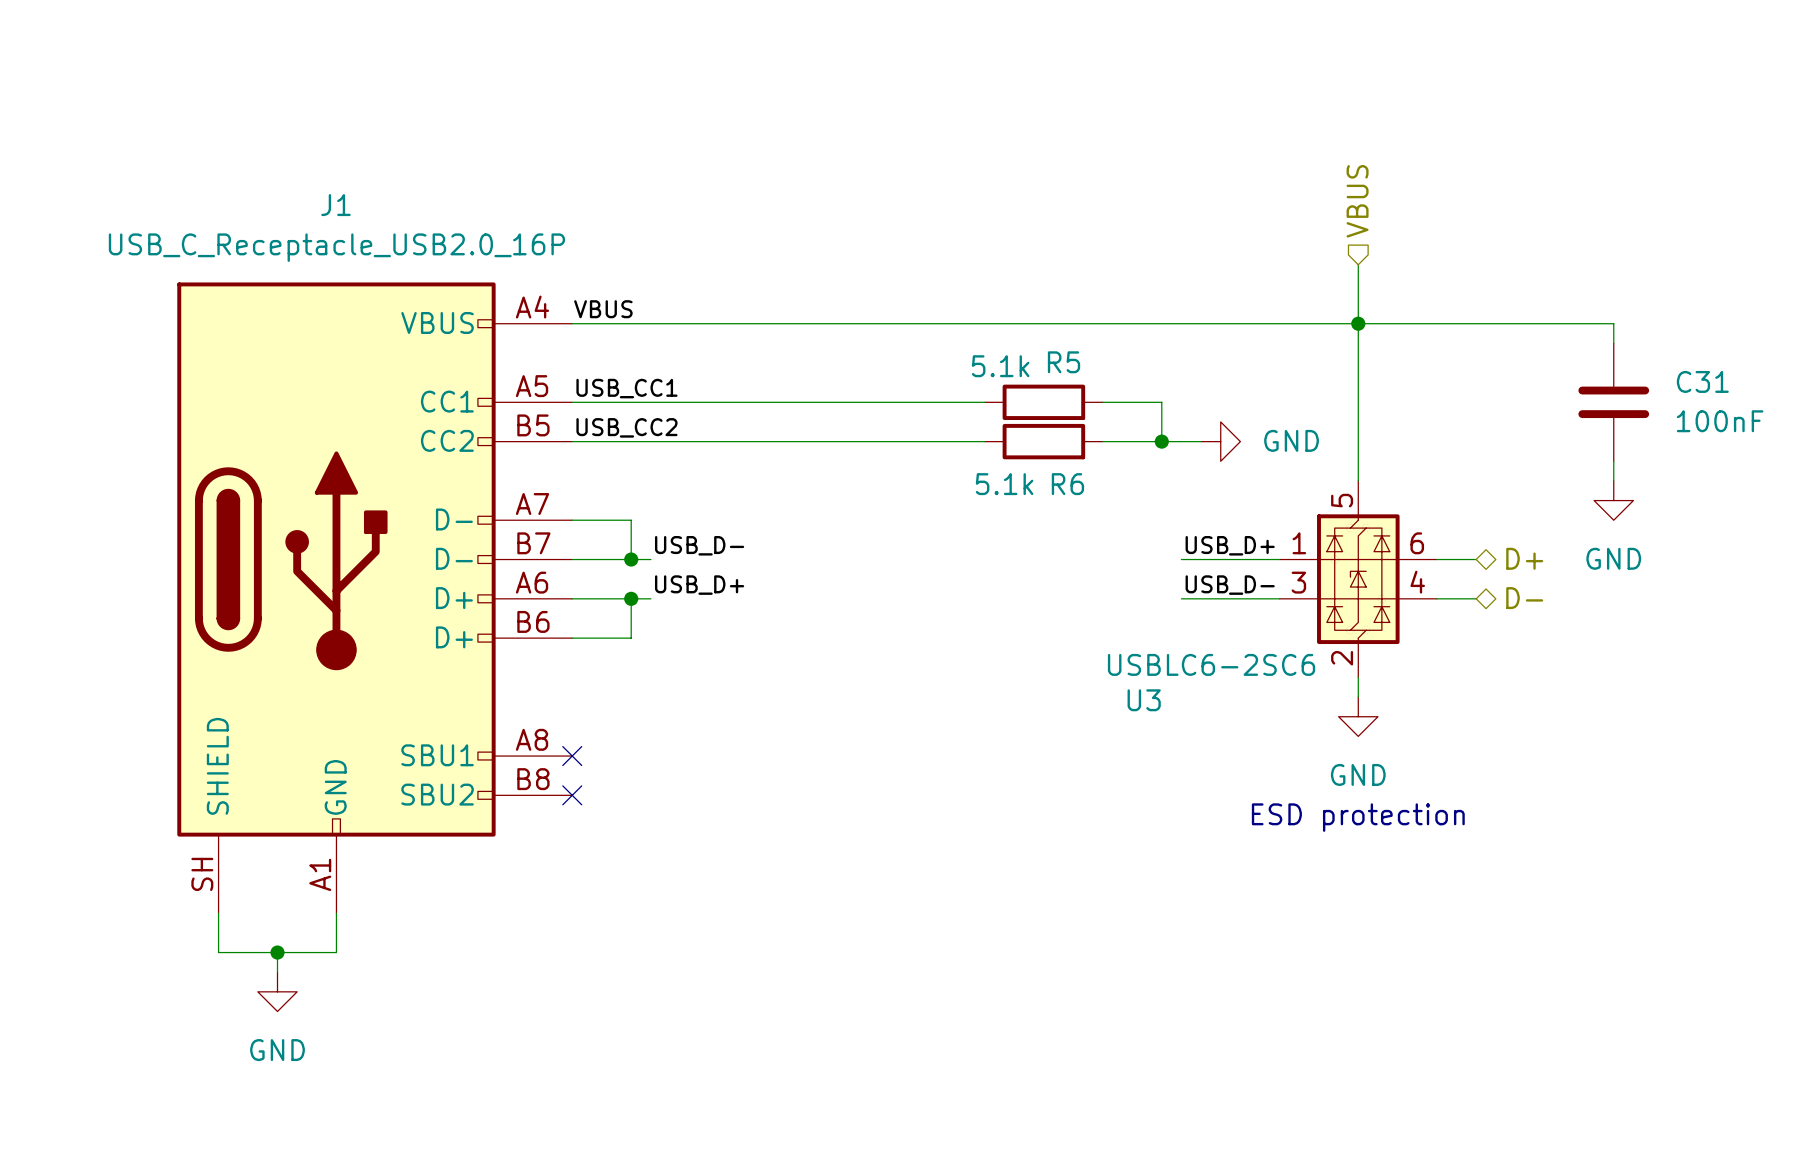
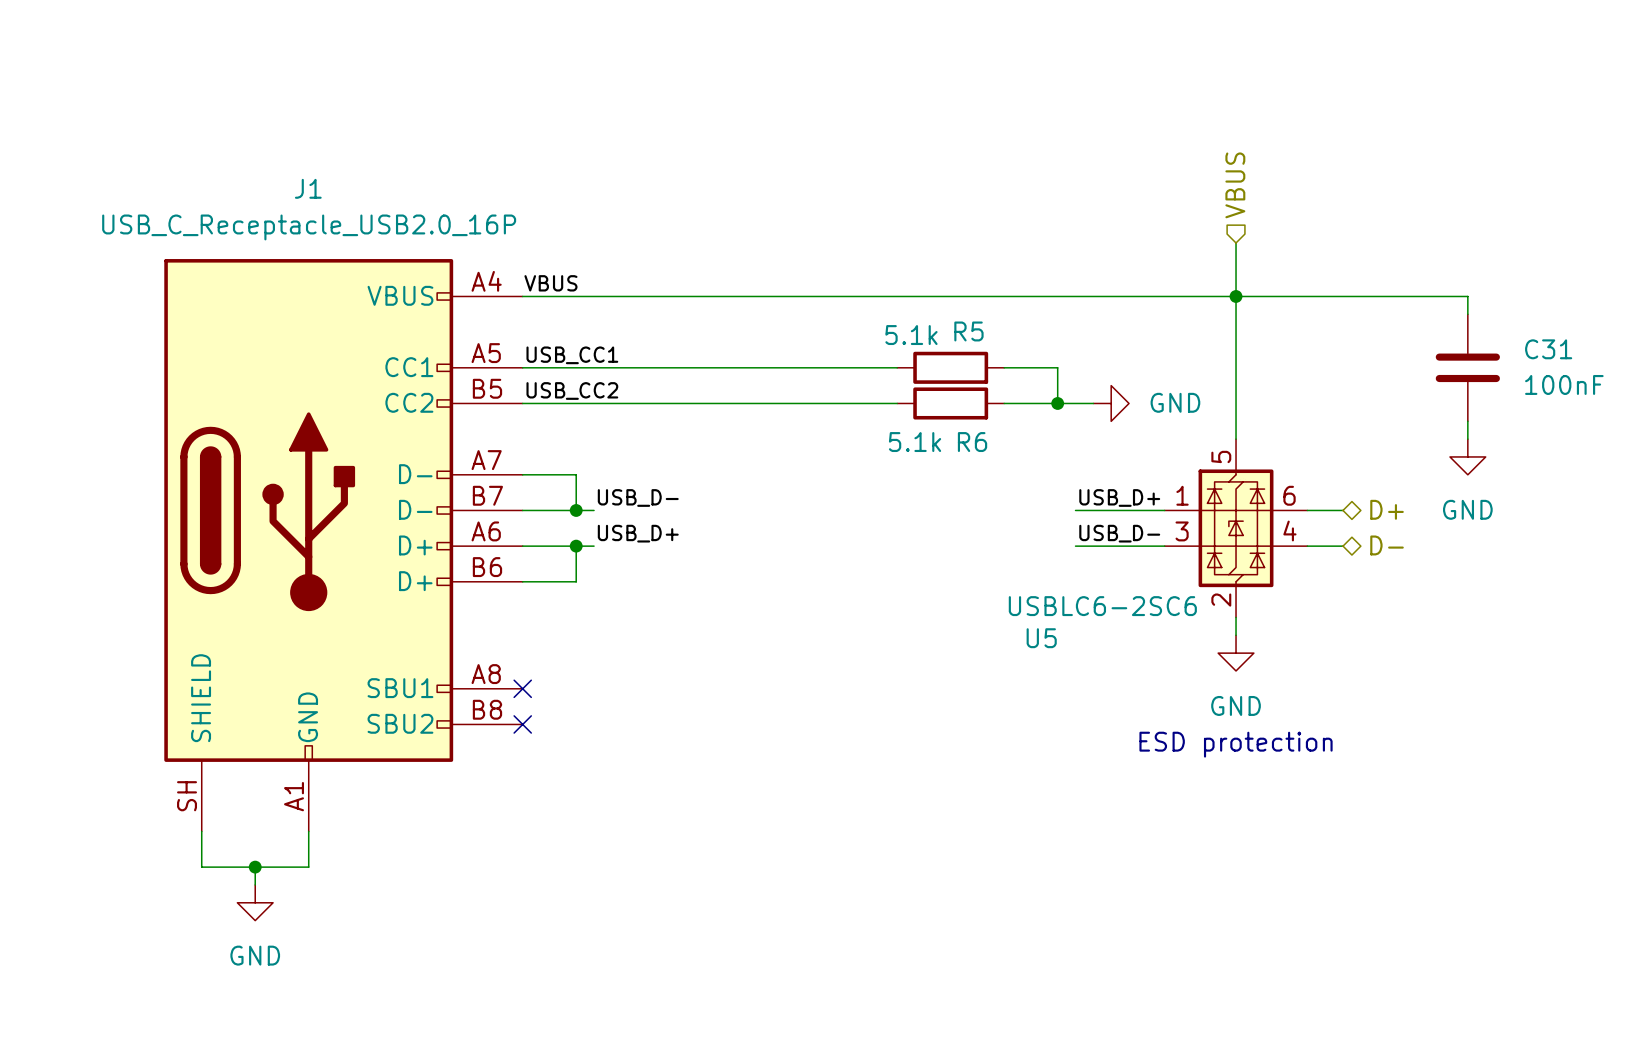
U3 name: U3 (1144, 700) -> U5 (1041, 638)

